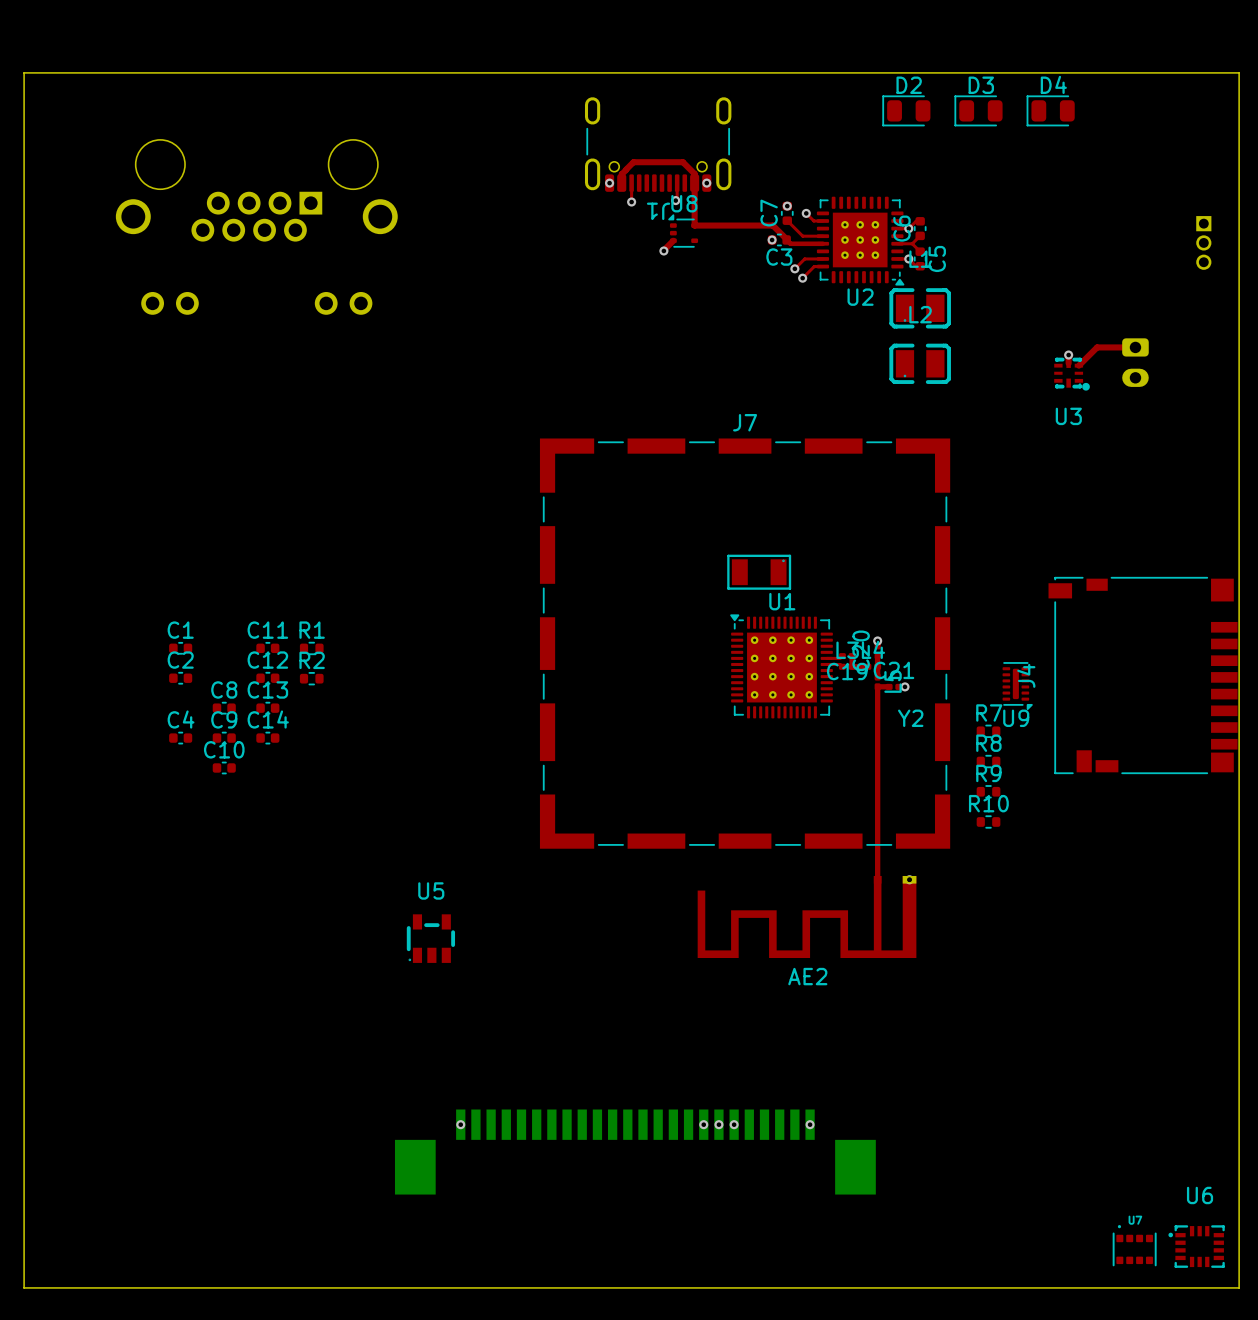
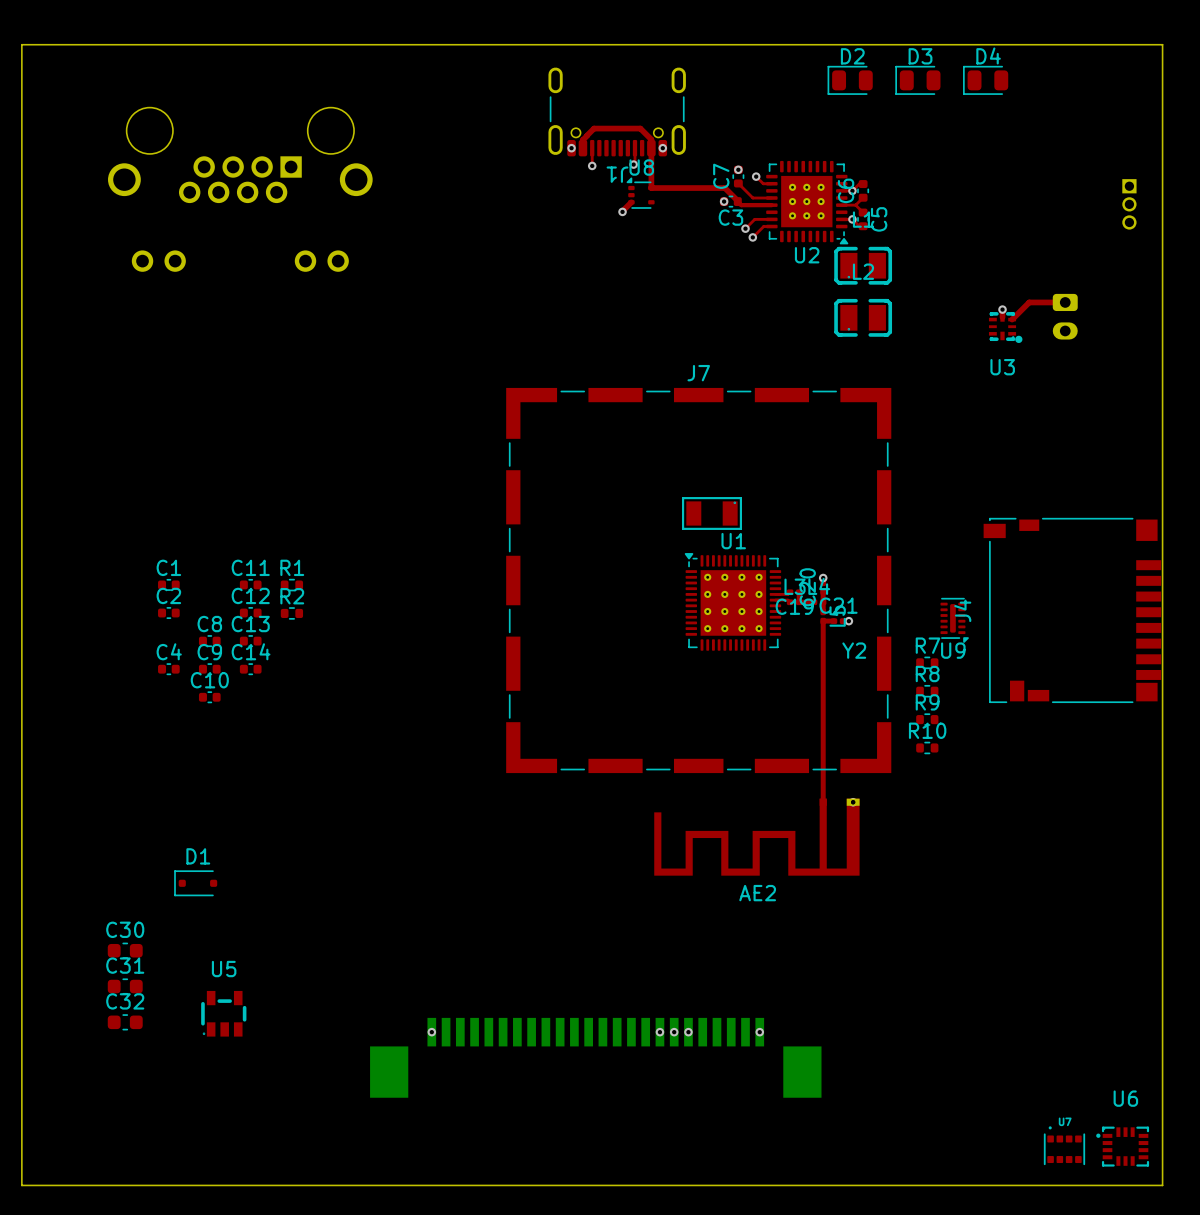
U5 position: (430, 938) -> (223, 1013)
D1: none -> (195, 883)
C30: none -> (125, 950)
C31: none -> (125, 986)
C32: none -> (125, 1022)

